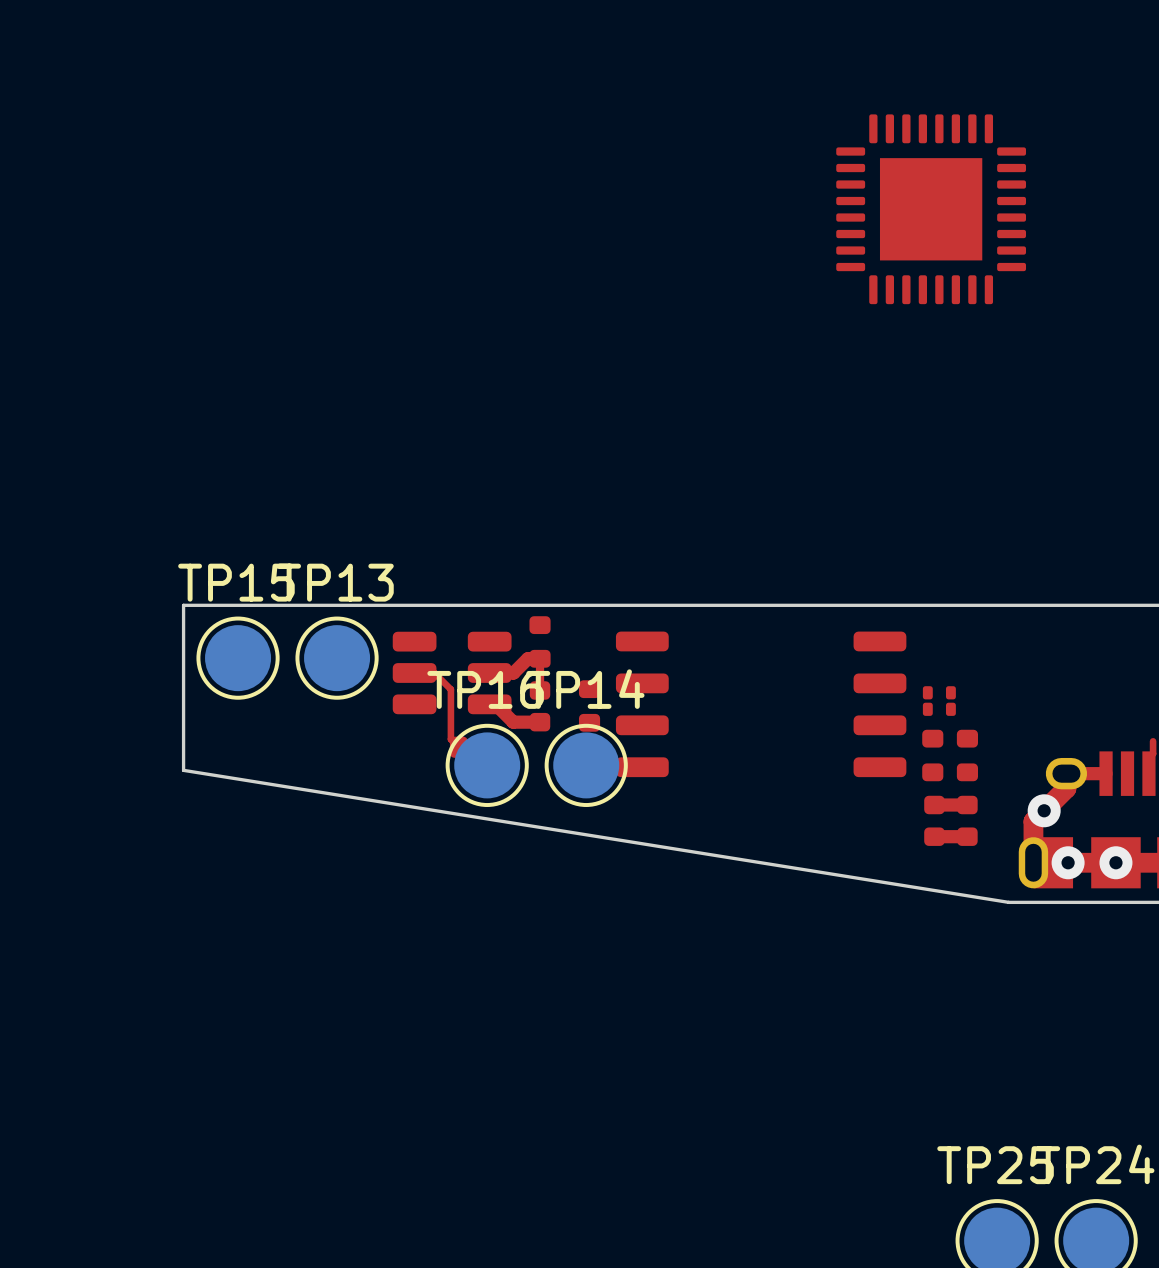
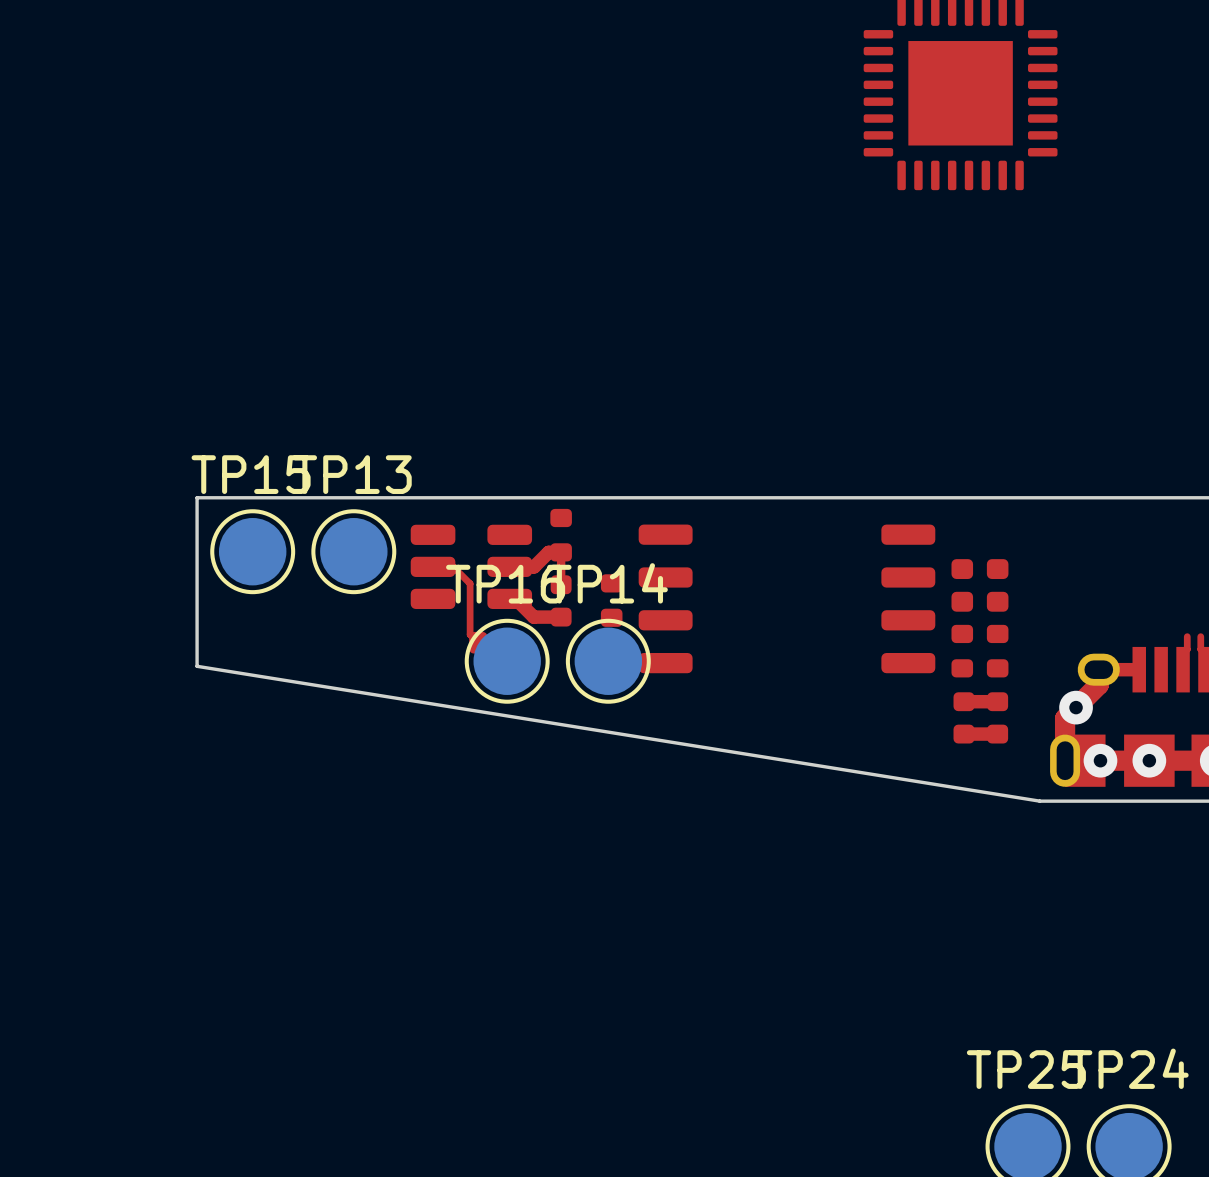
part: none -> (962, 585)
part: none -> (997, 585)
part: (927, 701) -> none
part: (950, 701) -> none

